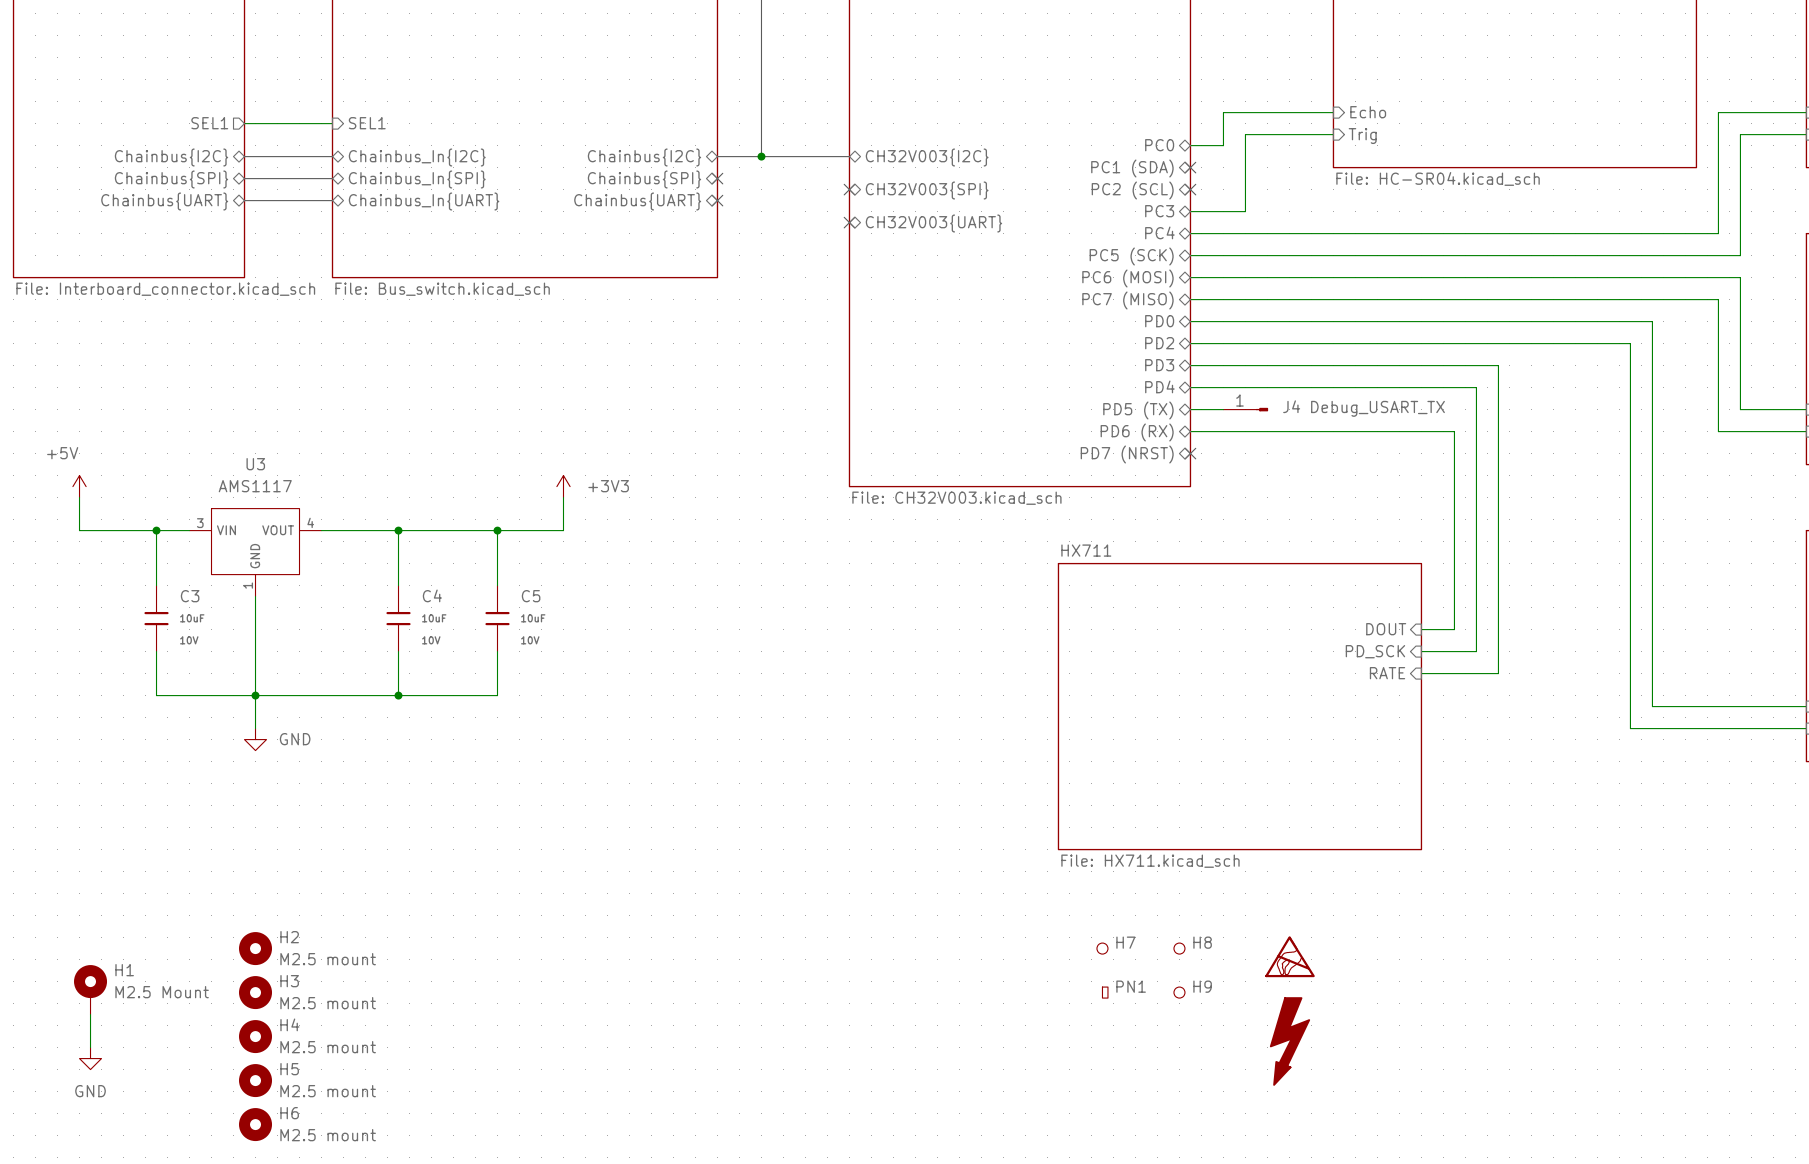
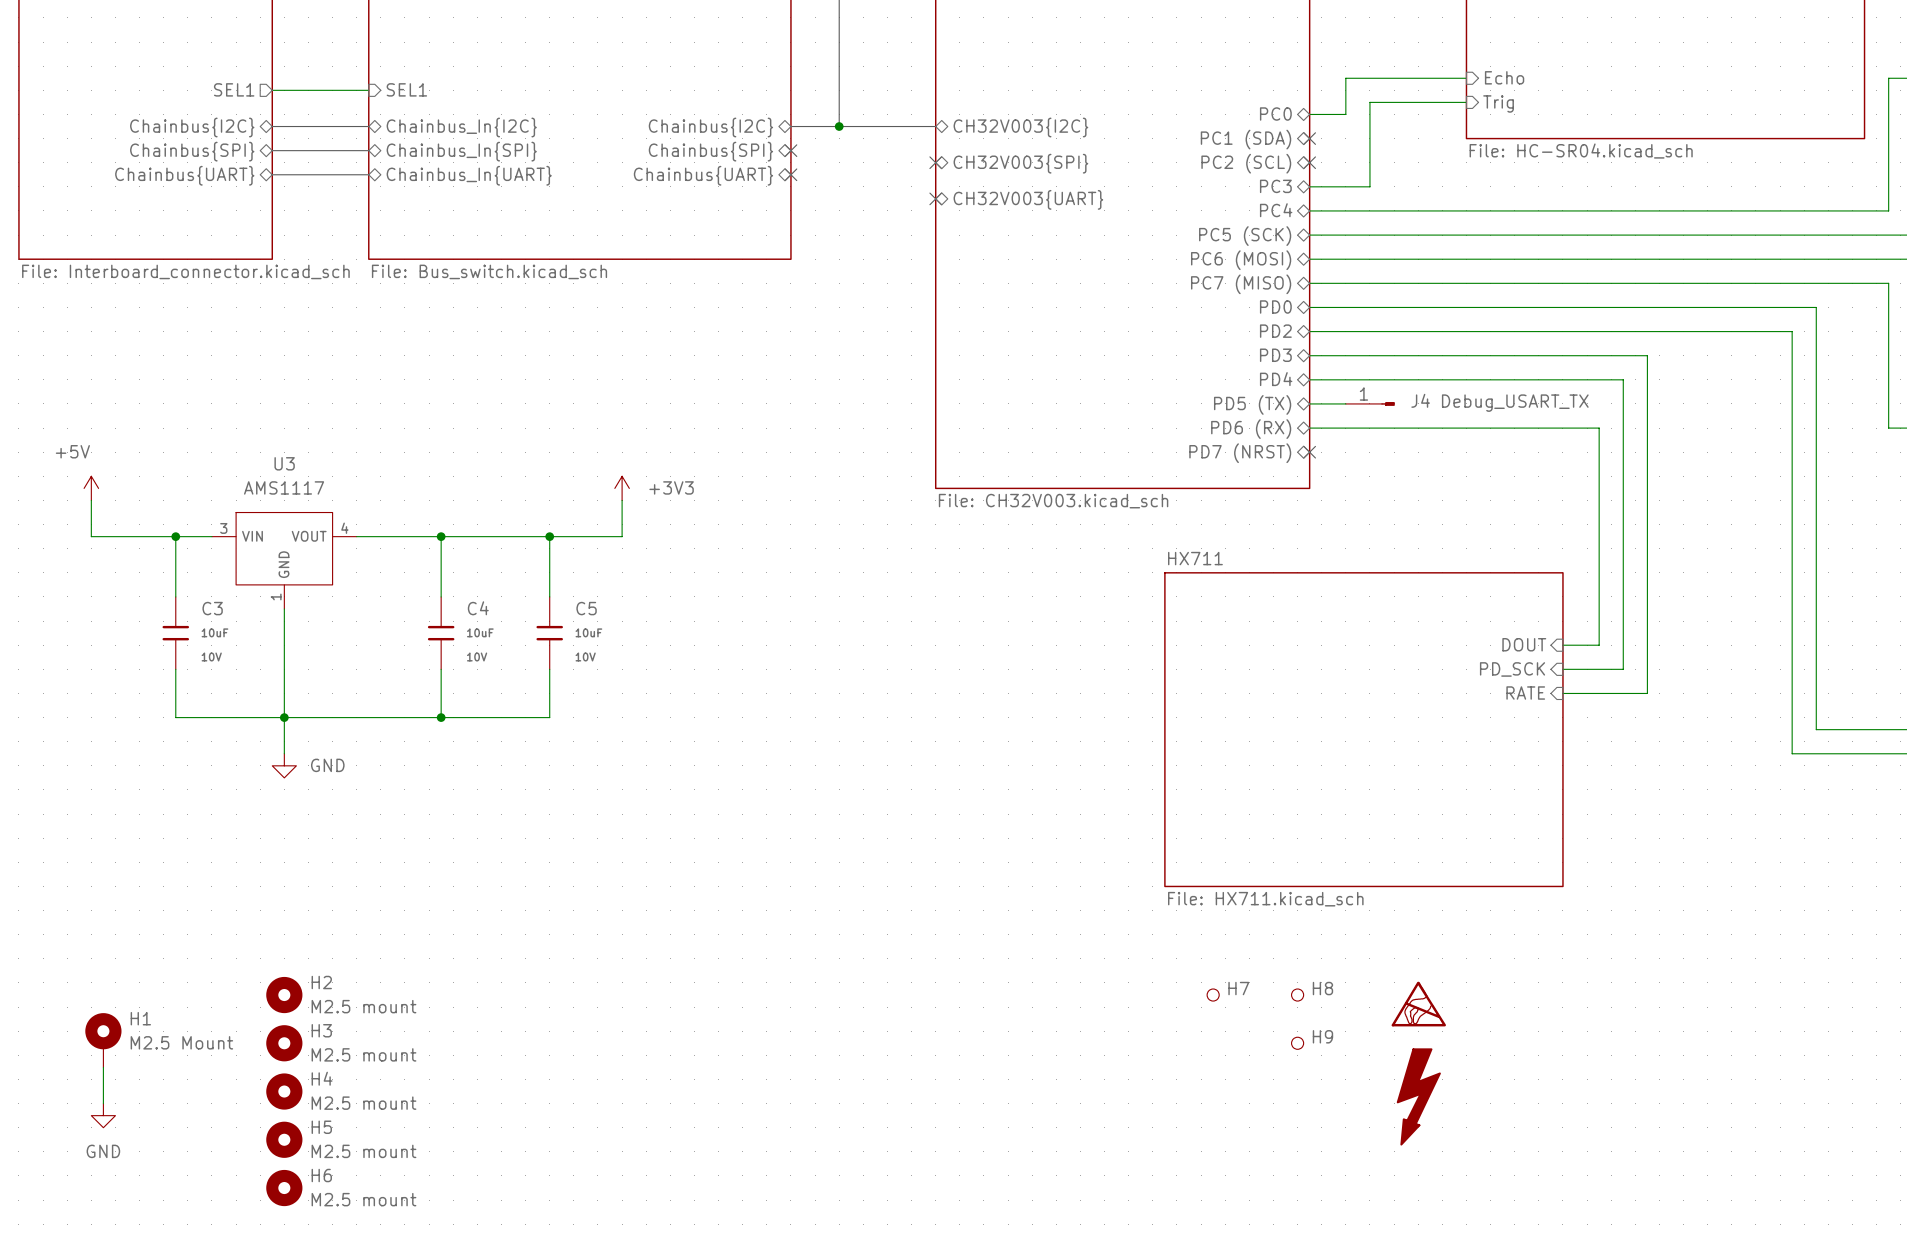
PN1: (1105, 992) -> none

